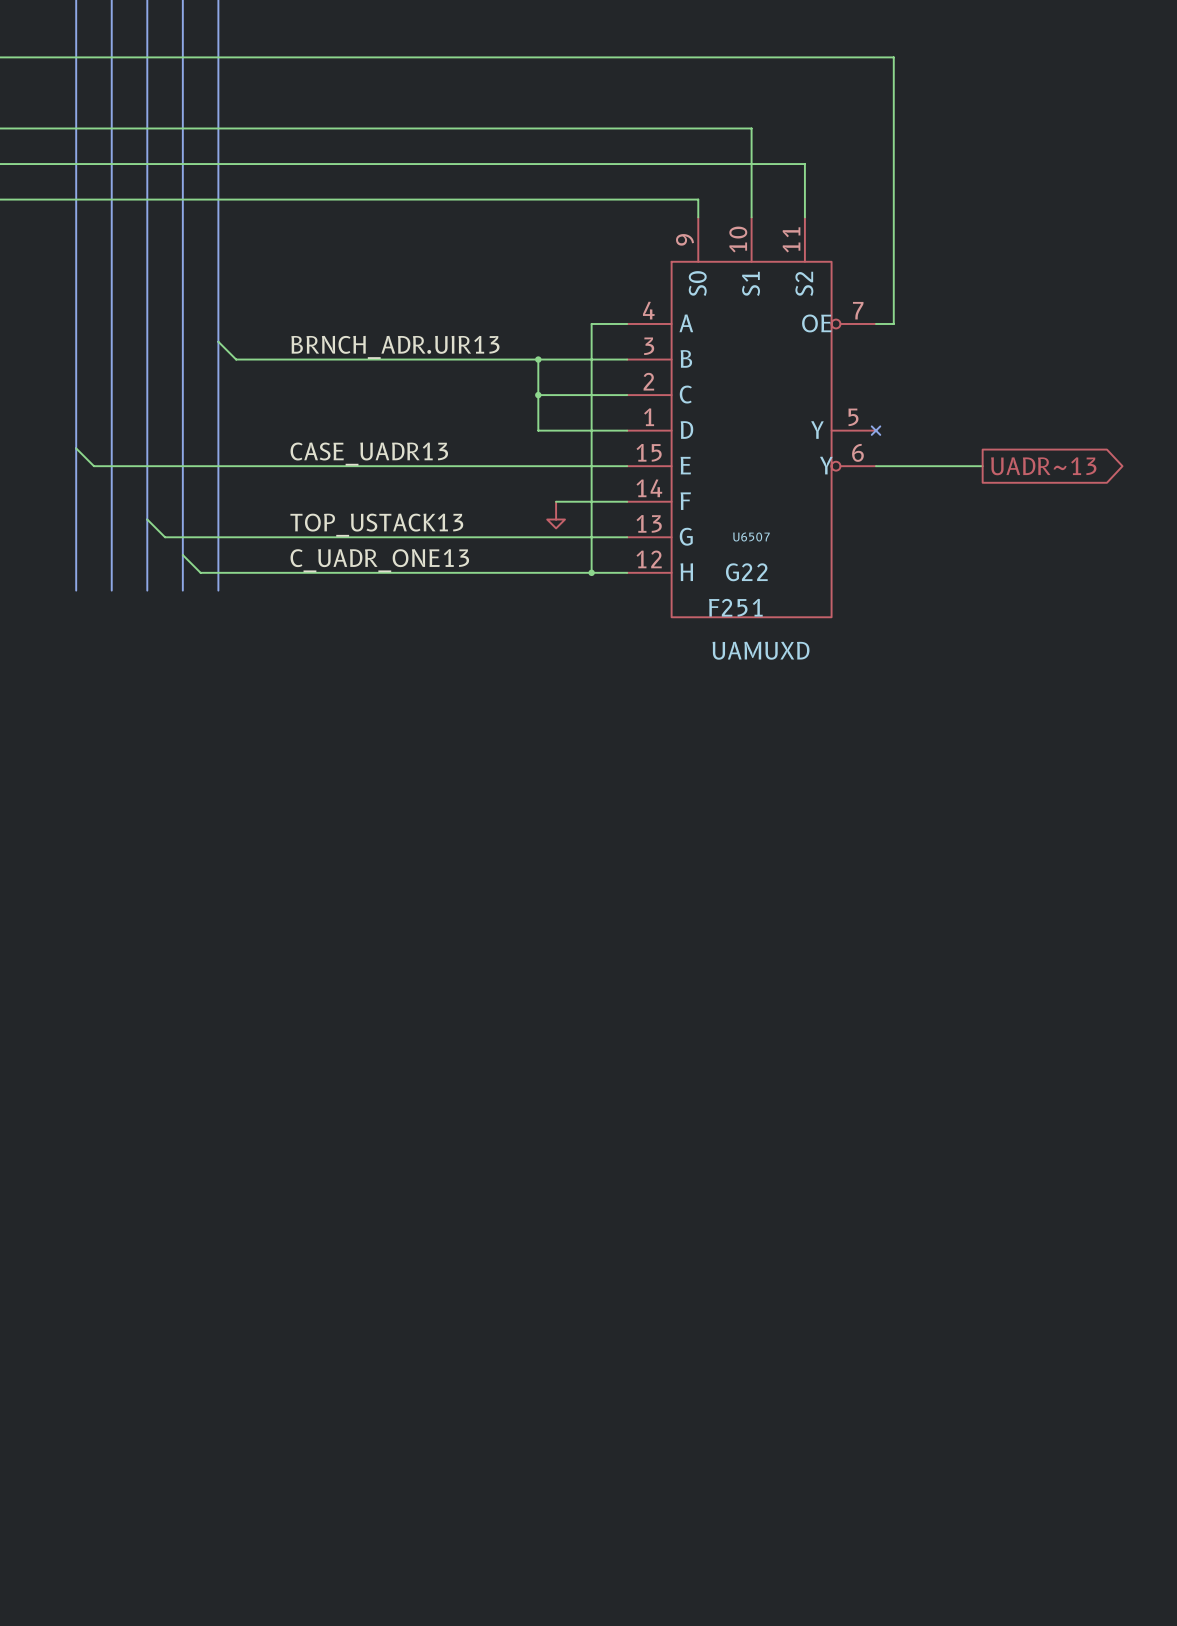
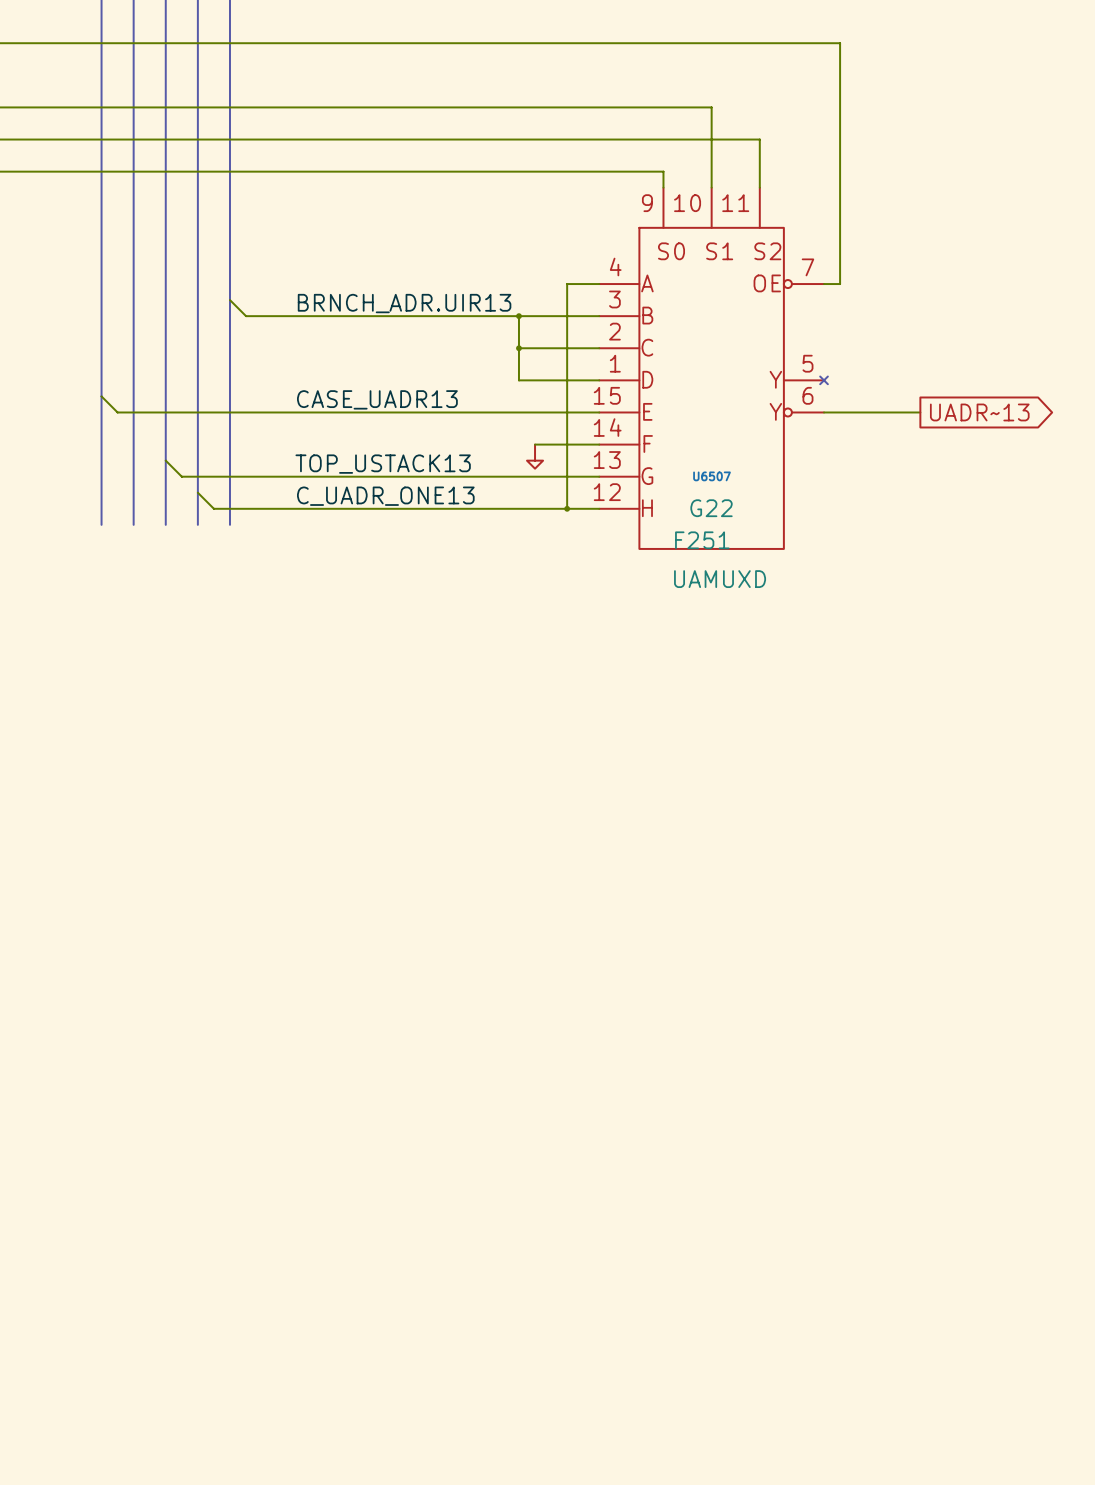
U6507 symbol: [627, 217, 877, 618] -> [599, 187, 825, 549]

